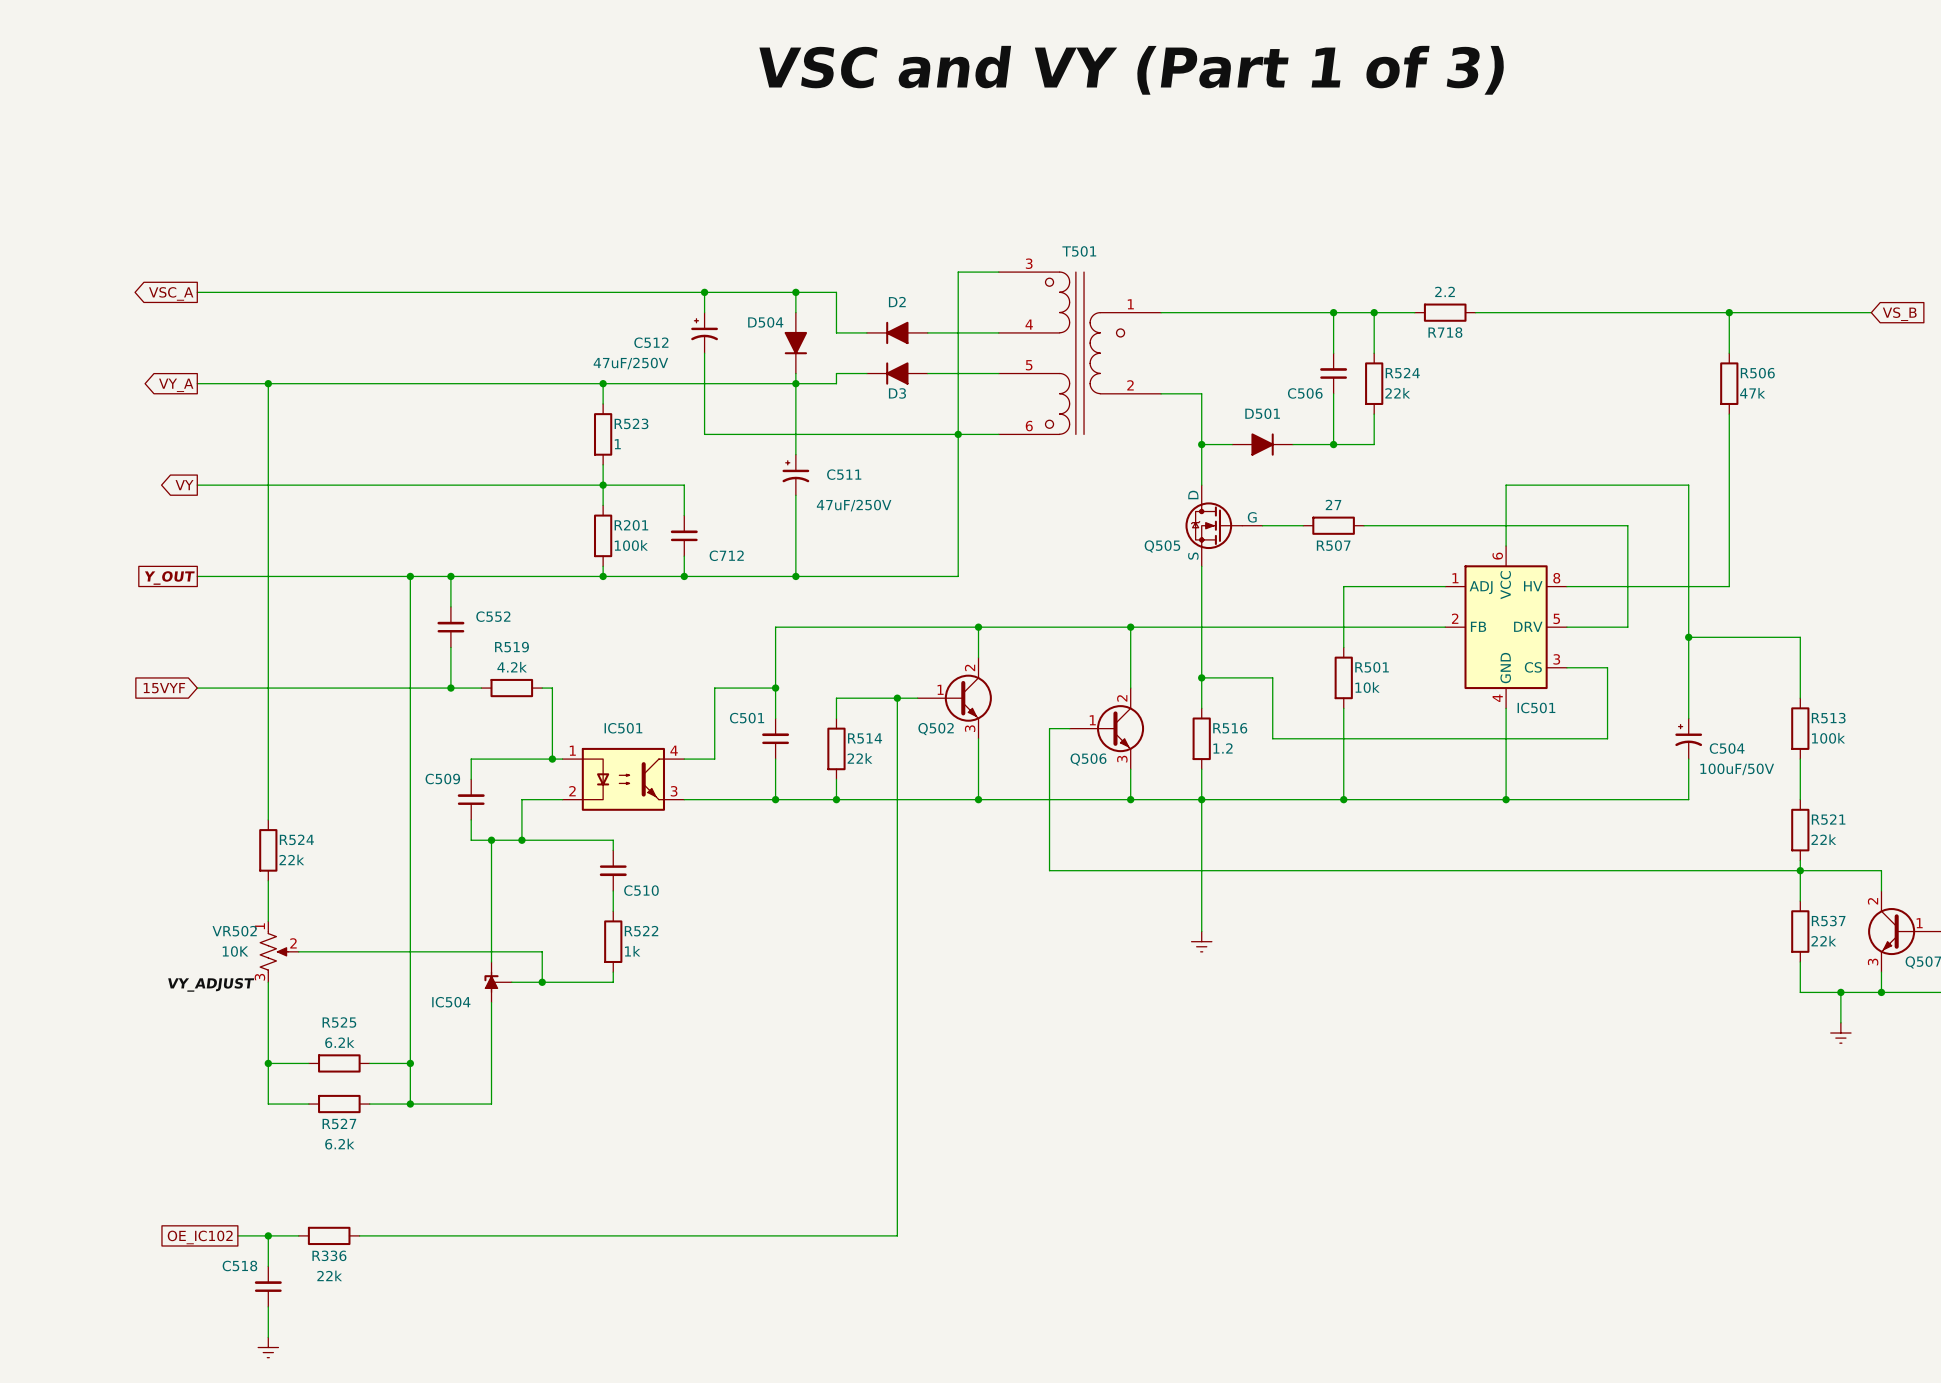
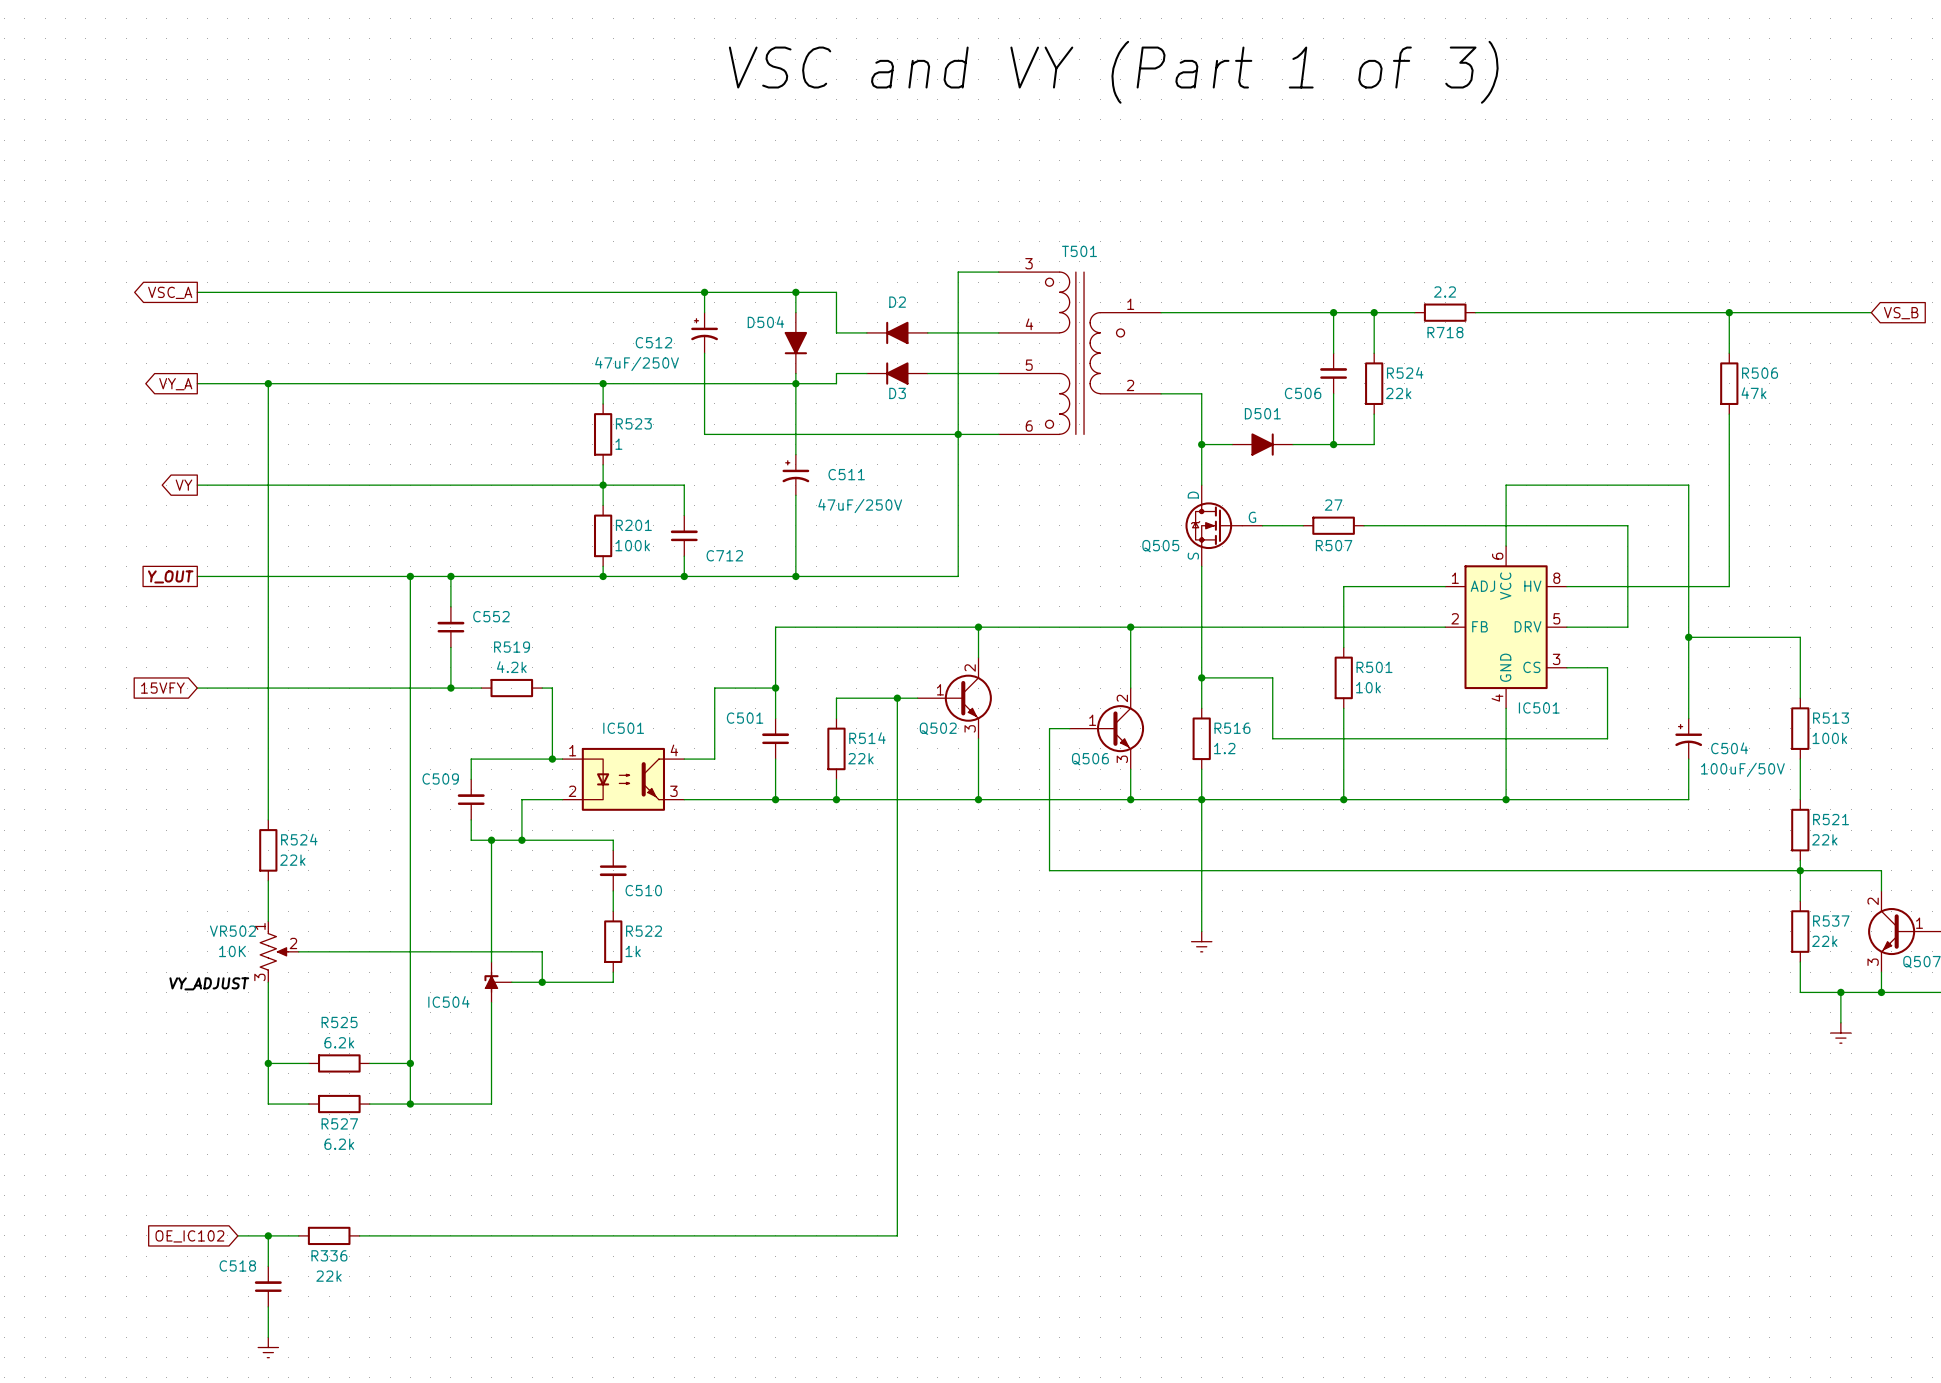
global label: 15VYF (164, 688) -> 15VFY (162, 688)
global label shape: passive (200, 1237) -> input (189, 1236)

